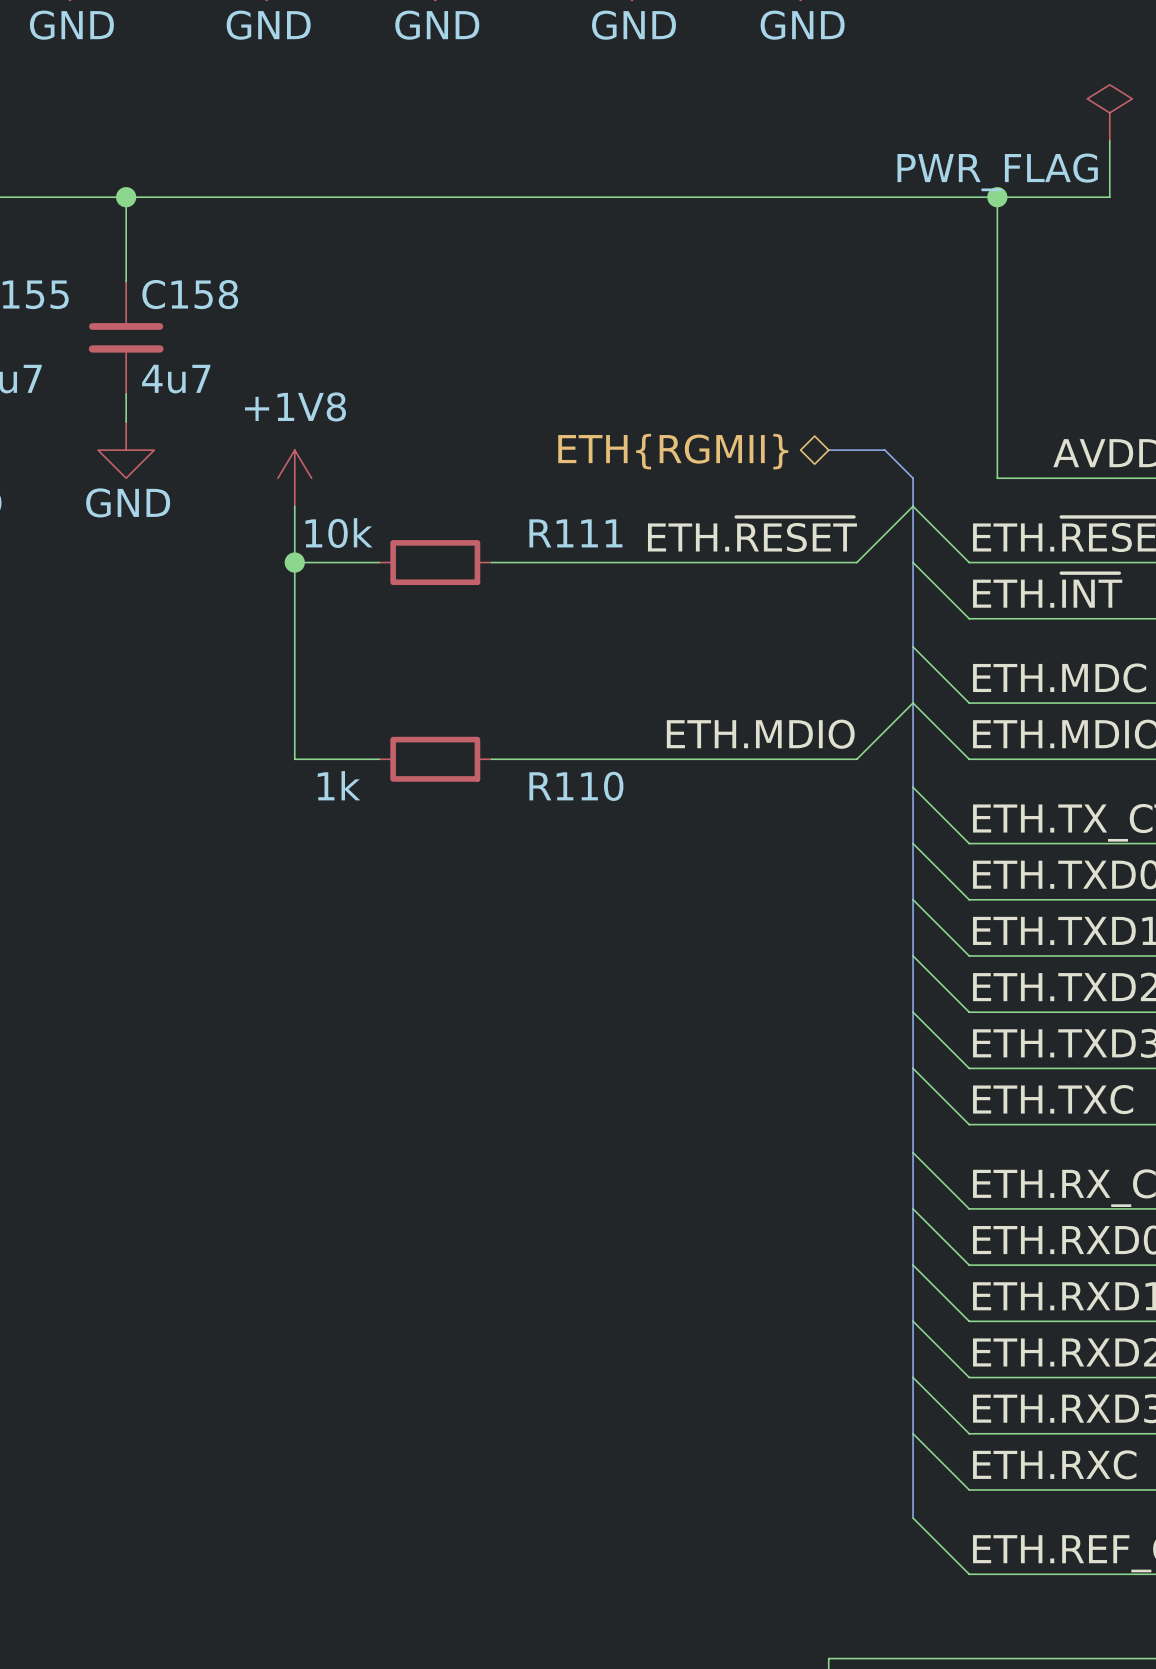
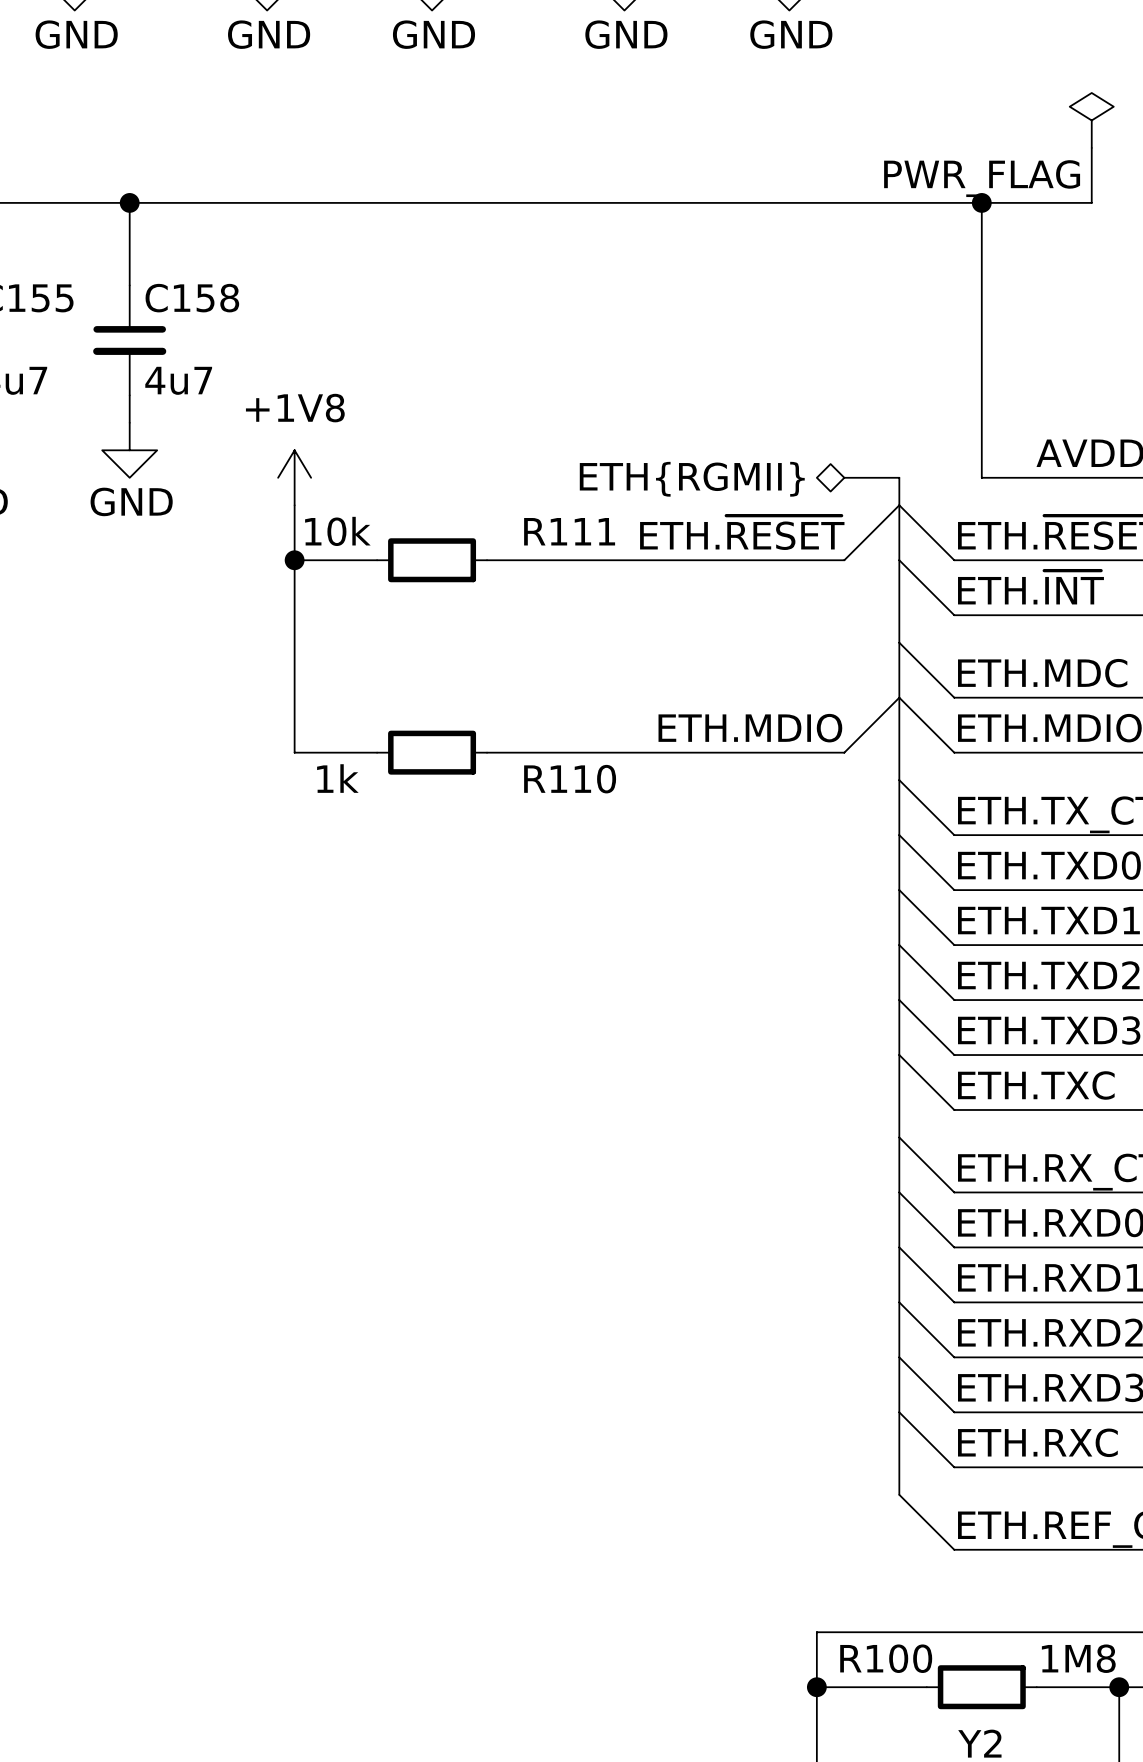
bus: (828, 450) (884, 450) (913, 478) -> (844, 477) (899, 477)
hierarchical label position: ETH{RGMII} (673, 451) -> ETH{RGMII} (692, 479)

